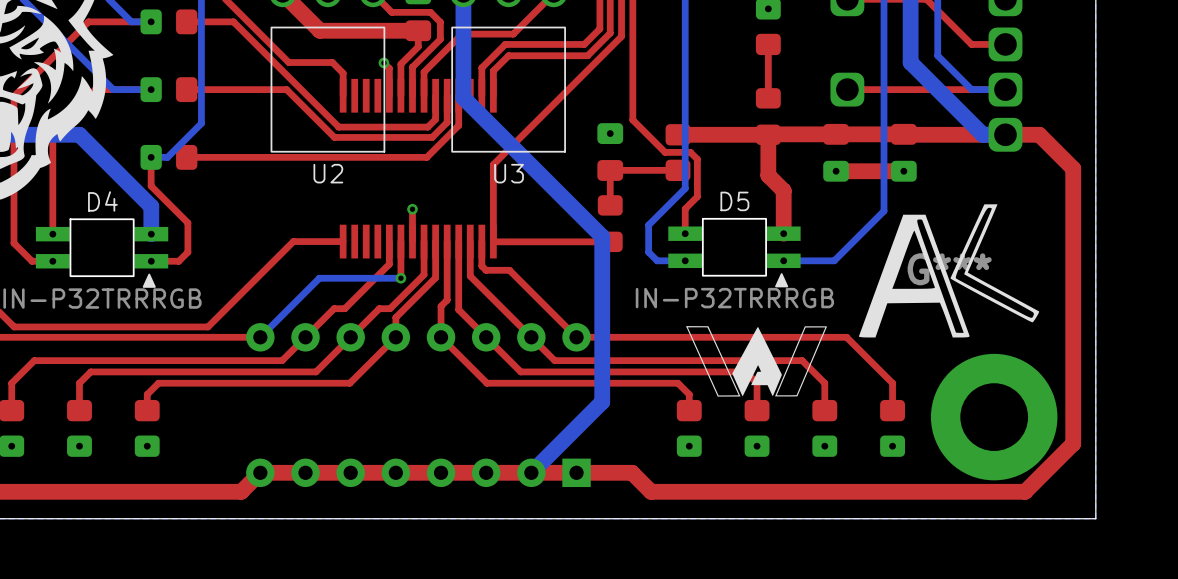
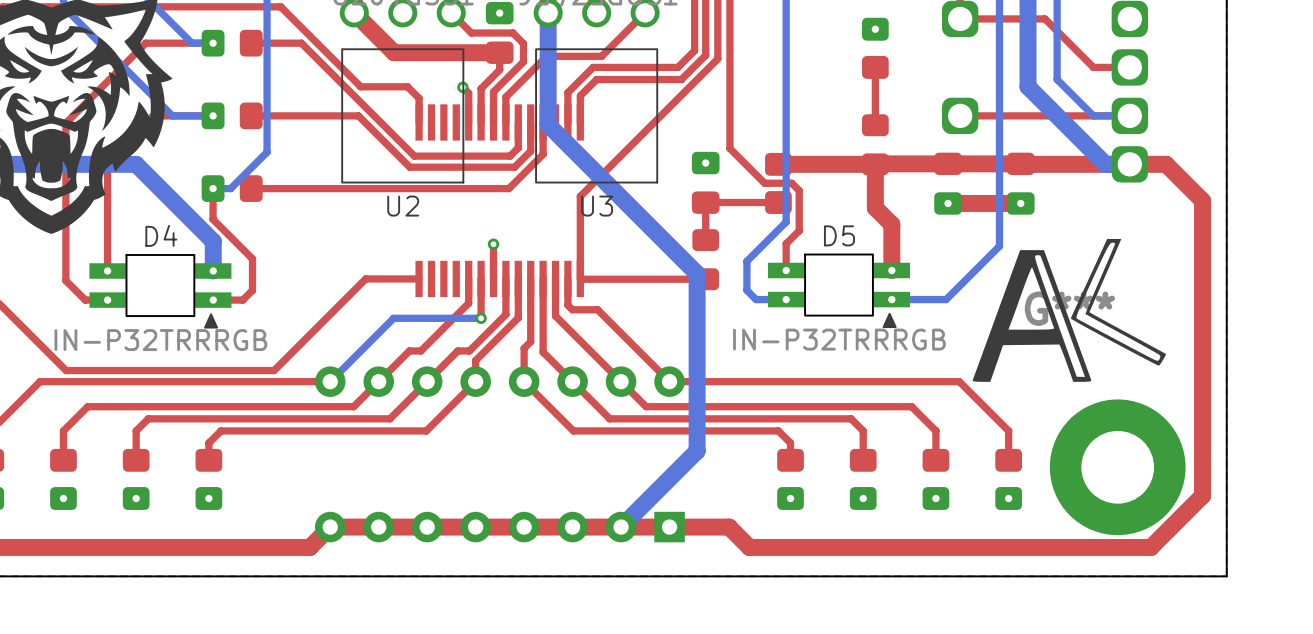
drawing: [686, 326, 828, 397] -> none

